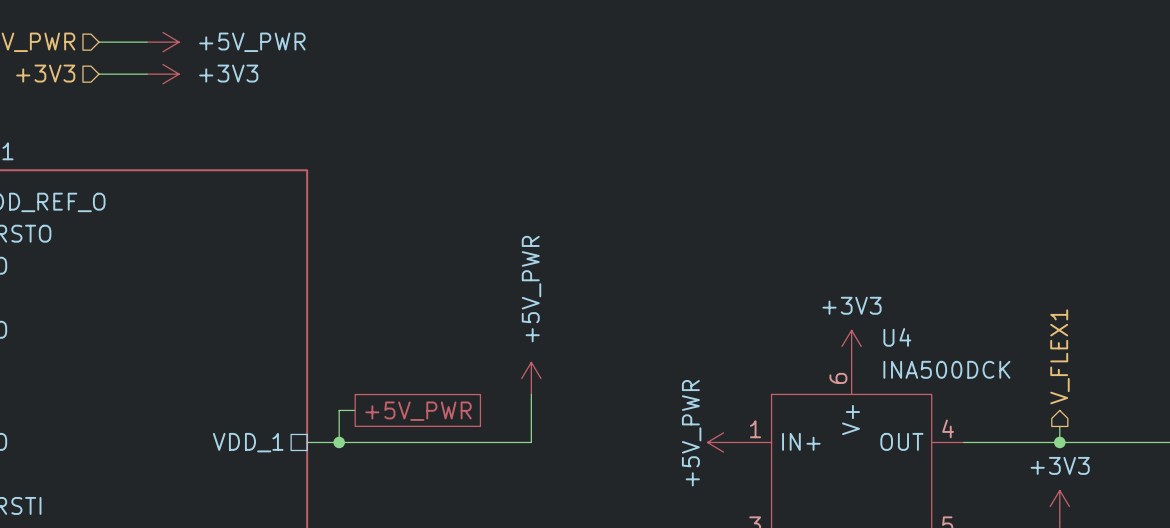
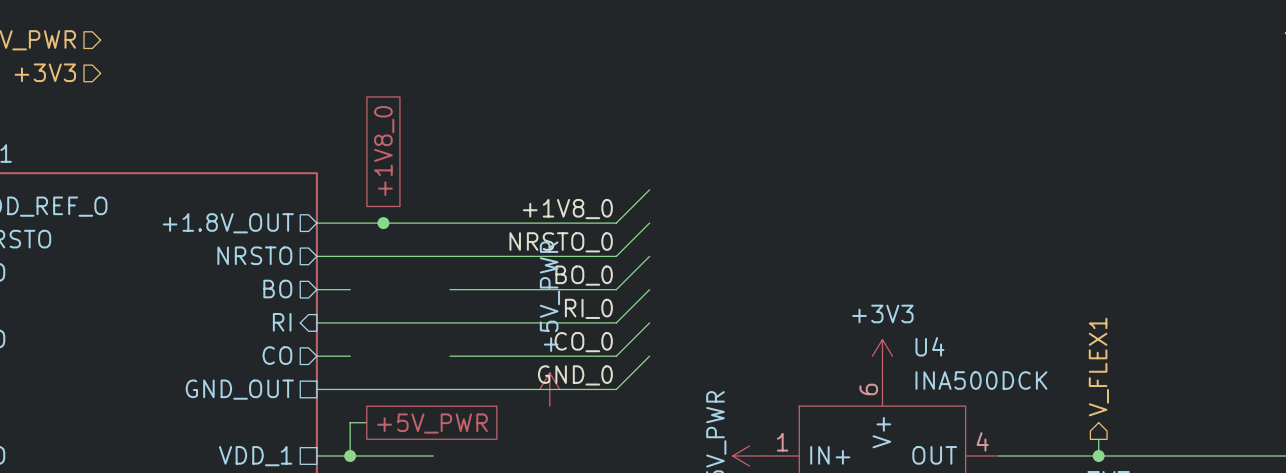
wire: (98, 42) (147, 42) -> none
power symbol: +5V_PWR (163, 42) -> none
wire: (98, 74) (147, 74) -> none
power symbol: +3V3 (163, 74) -> none
global label: none -> +1V8_0 (384, 150)
wire: none -> (649, 189) (616, 223) (316, 223)
label: none -> +1V8_0 (567, 209)
sheet pin: none -> +1.8V_OUT (228, 223)
junction: none -> (383, 223)
wire: none -> (649, 223) (616, 256) (316, 256)
label: none -> NRSTO_0 (561, 242)
sheet pin: none -> NRSTO (254, 255)
wire: none -> (649, 256) (616, 289) (449, 289)
label: none -> BO_0 (584, 275)
sheet pin: none -> BO (277, 289)
wire: none -> (316, 289) (350, 289)
wire: none -> (649, 289) (616, 322) (316, 322)
label: none -> RI_0 (588, 308)
sheet pin: none -> RI (282, 322)
wire: none -> (649, 322) (616, 356) (449, 356)
label: none -> CO_0 (583, 342)
sheet pin: none -> CO (277, 355)
wire: none -> (316, 356) (350, 356)
wire: none -> (649, 356) (616, 389) (316, 389)
label: none -> GND_0 (575, 375)
sheet pin: none -> GND_OUT (239, 389)
wire: (531, 394) (531, 442) (419, 442) -> none

